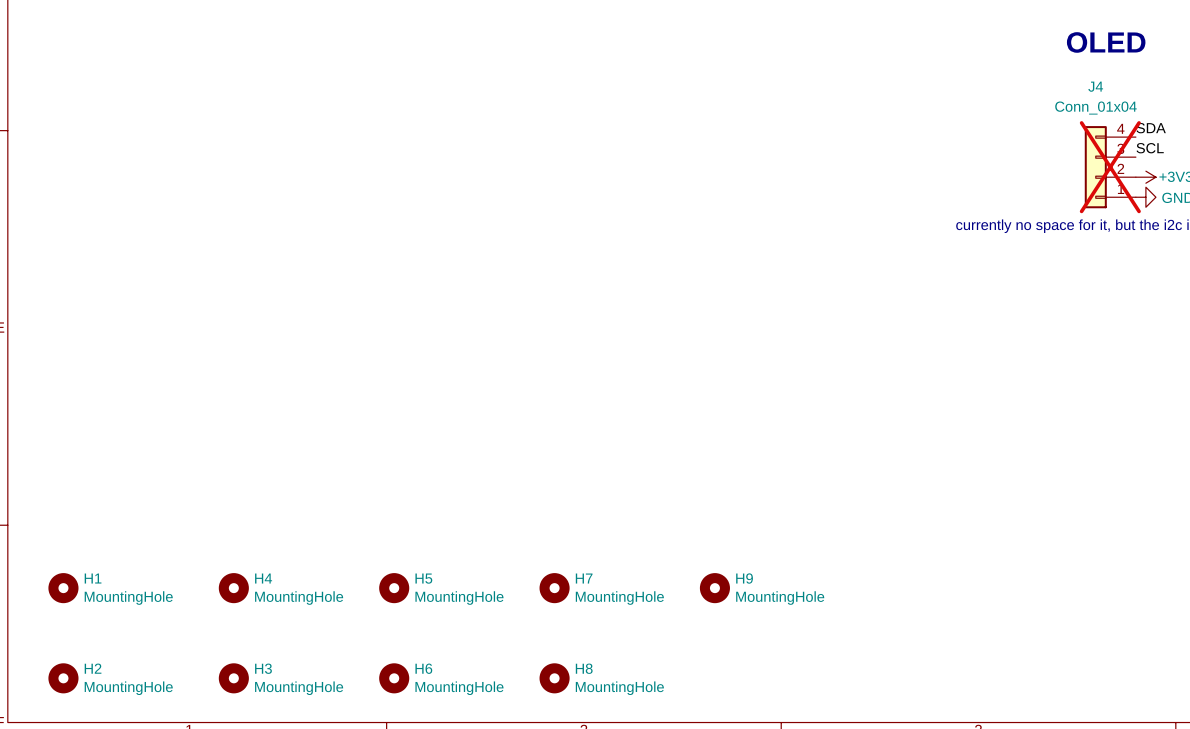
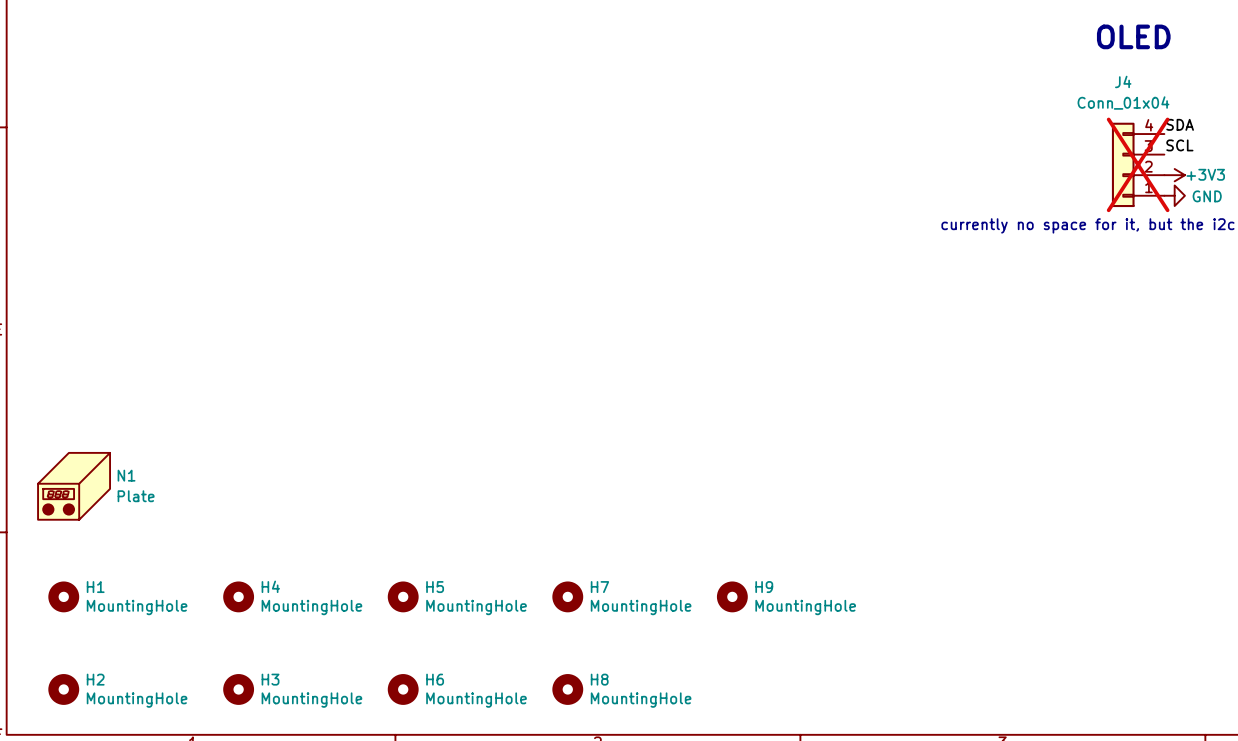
N1: none -> Plate (74, 486)

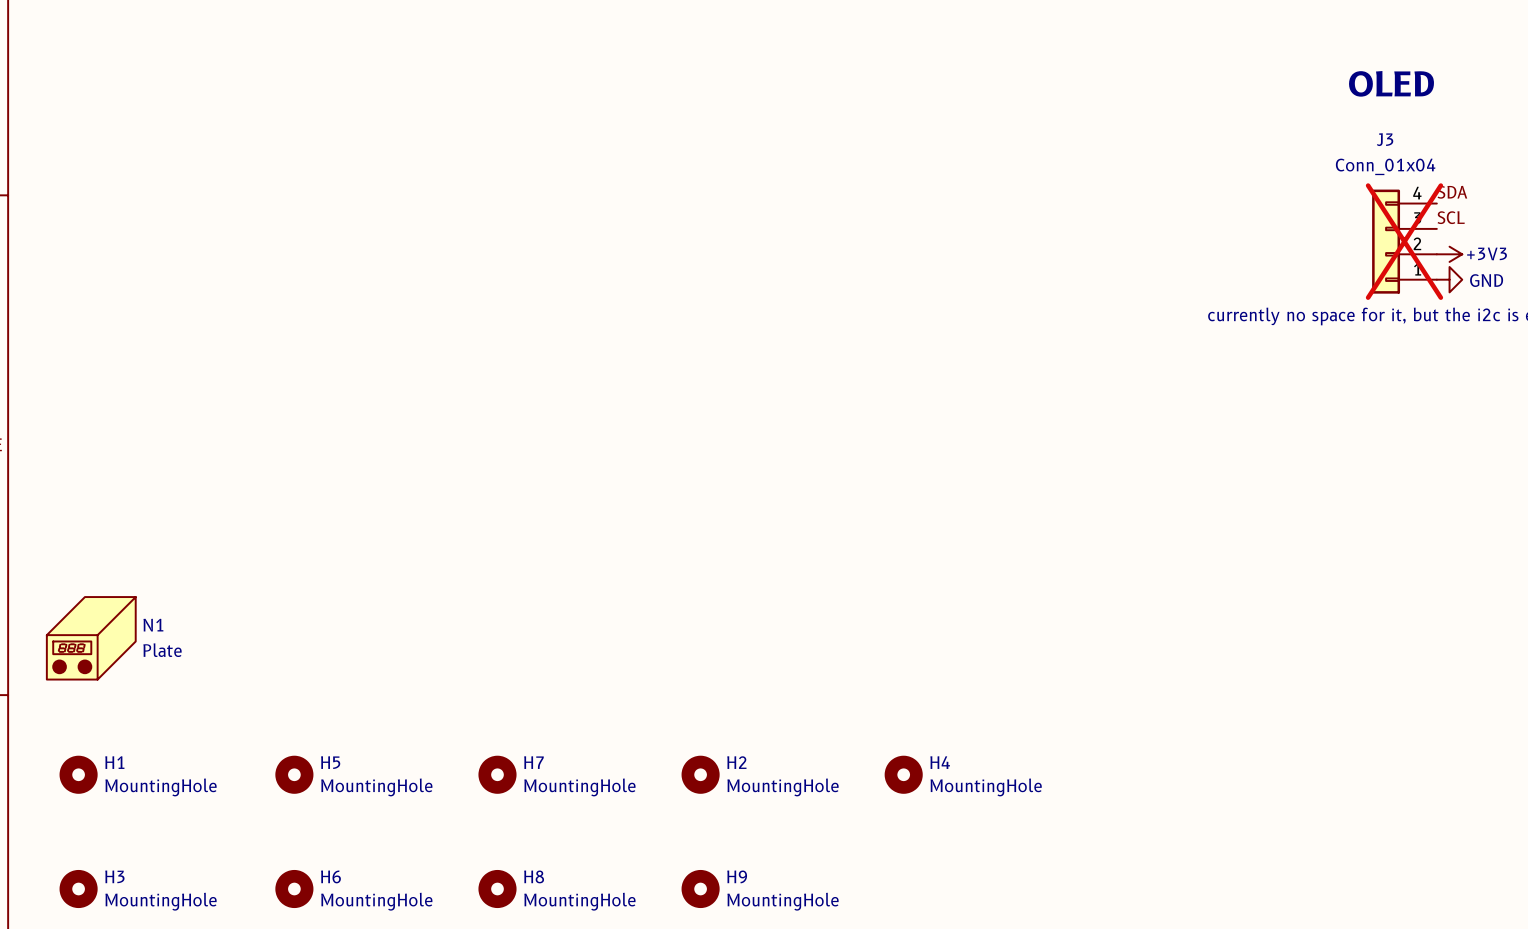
J4 name: J4 (1123, 81) -> J3 (1385, 139)
H4 name: H4 (270, 586) -> H5 (330, 762)
H5 name: H5 (435, 587) -> H7 (533, 762)
H7 name: H7 (599, 587) -> H2 (736, 762)
H9 name: H9 (764, 587) -> H4 (940, 762)
H2 name: H2 (95, 679) -> H3 (114, 876)
H3 name: H3 (270, 679) -> H6 (330, 876)
H6 name: H6 (435, 679) -> H8 (534, 876)
H8 name: H8 (599, 679) -> H9 (737, 876)

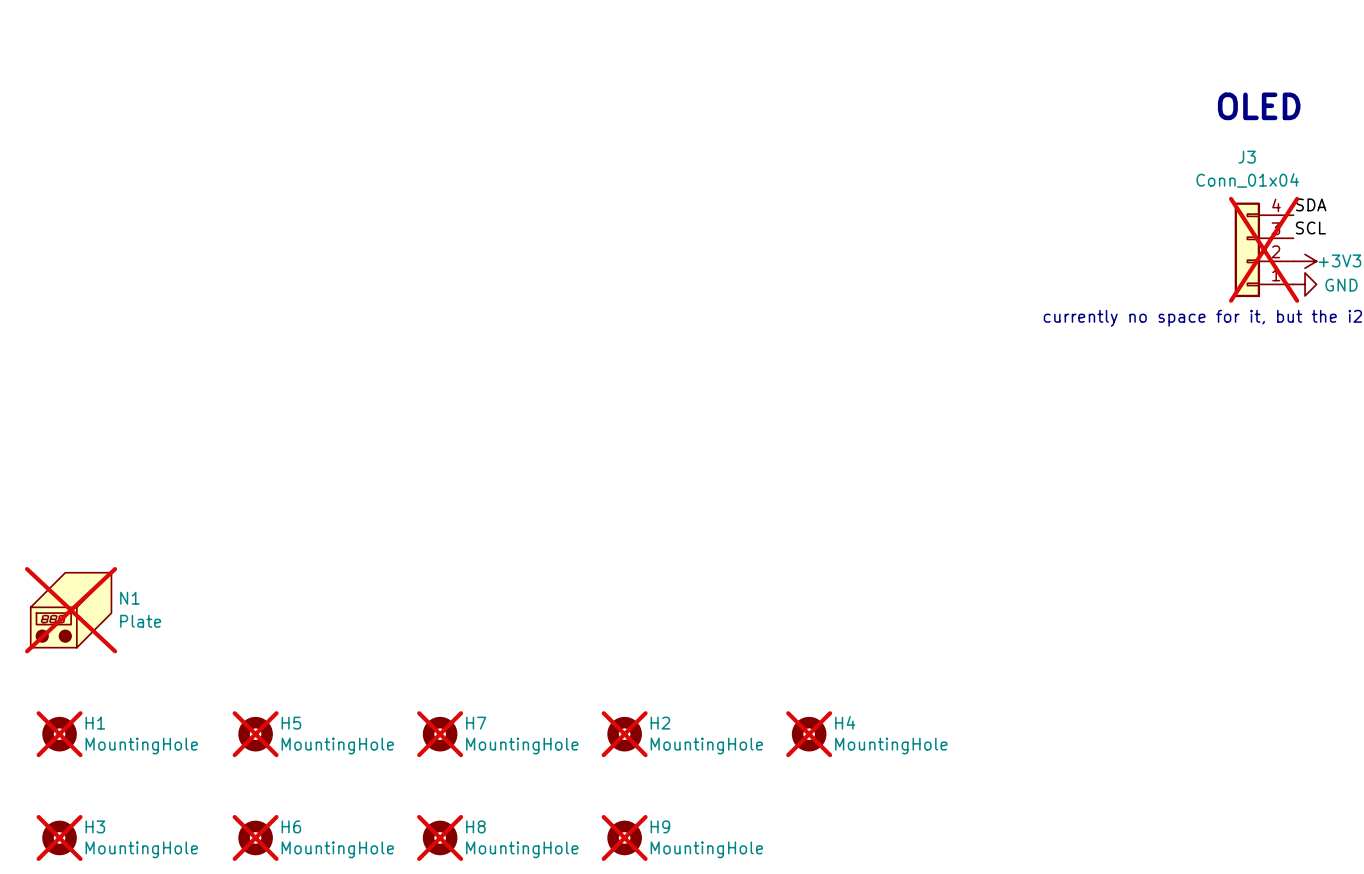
N1 do-not-place cross: none -> (71, 610)
H1 do-not-place cross: none -> (59, 734)
H5 do-not-place cross: none -> (255, 734)
H7 do-not-place cross: none -> (440, 734)
H2 do-not-place cross: none -> (624, 734)
H4 do-not-place cross: none -> (809, 734)
H3 do-not-place cross: none -> (59, 837)
H6 do-not-place cross: none -> (255, 837)
H8 do-not-place cross: none -> (440, 837)
H9 do-not-place cross: none -> (624, 837)

